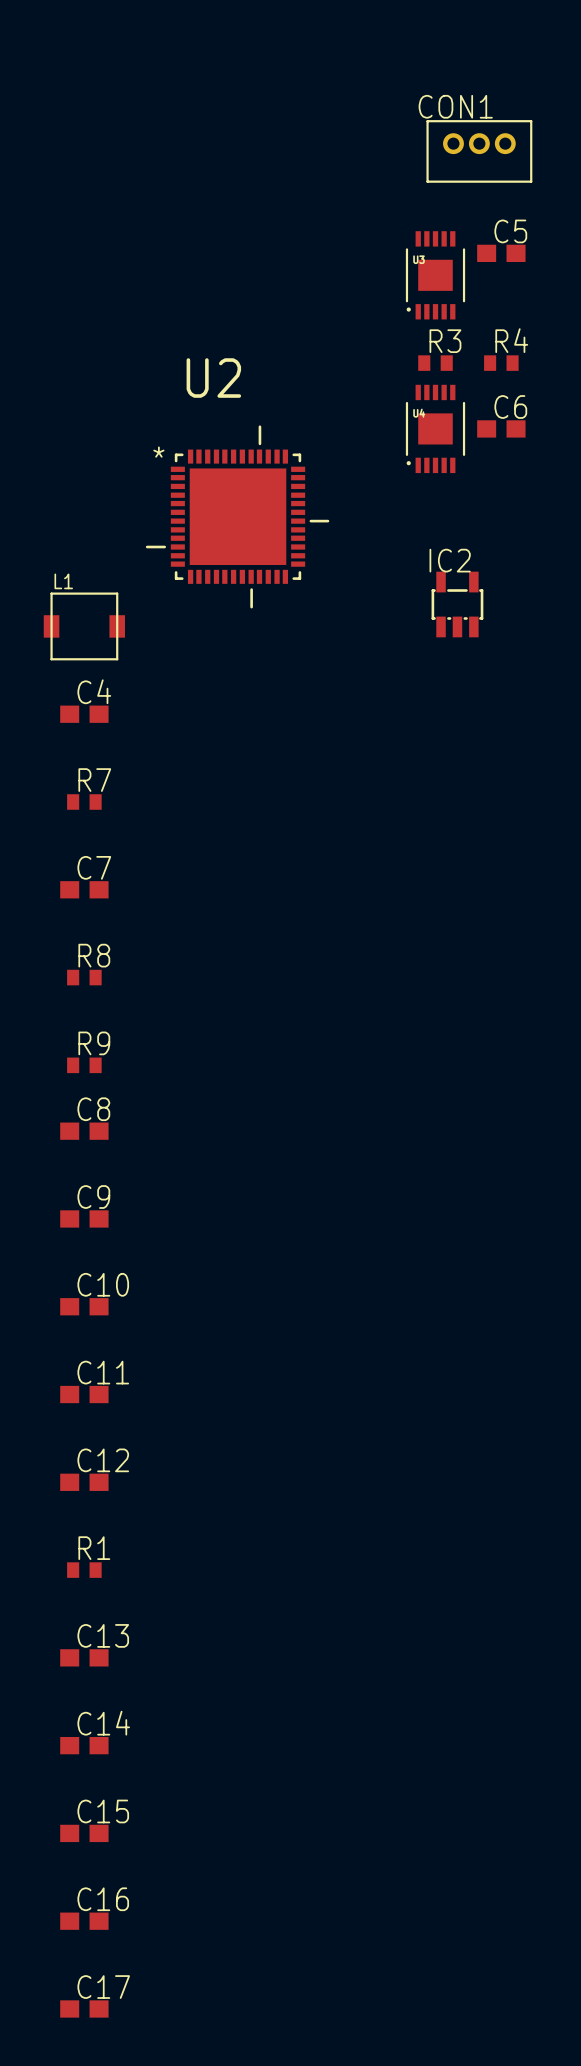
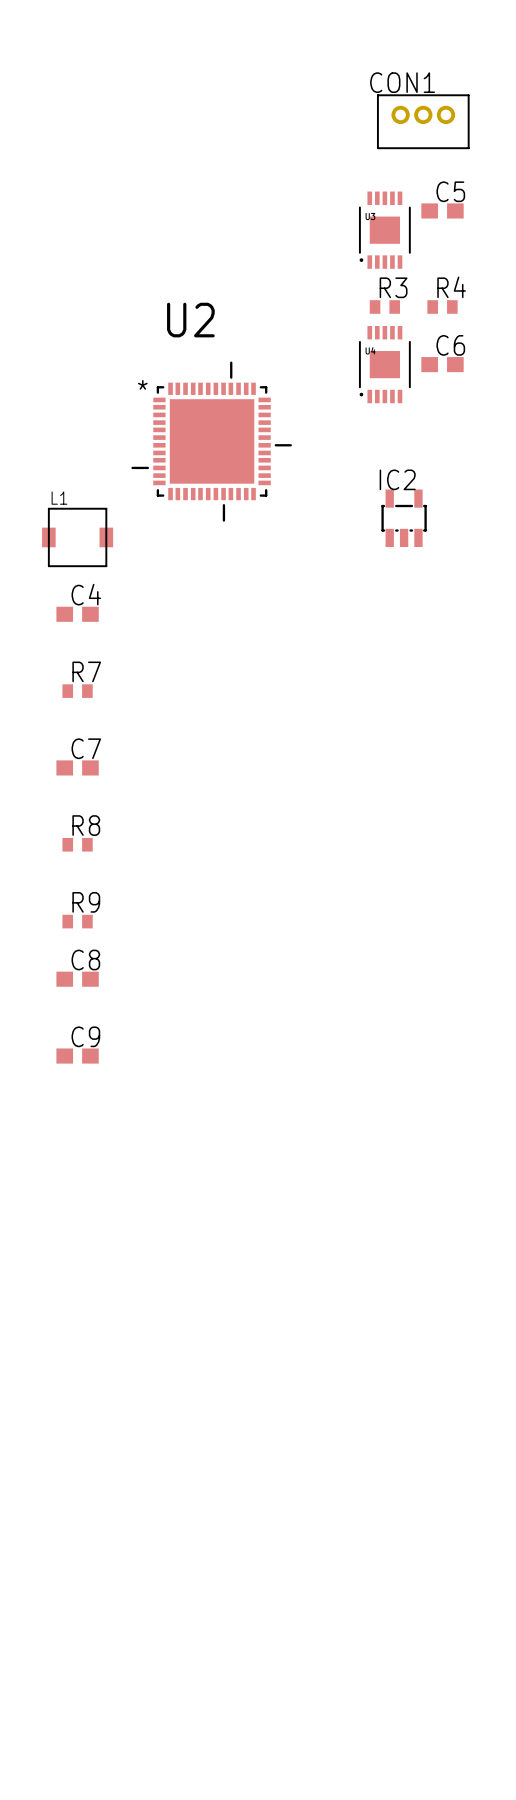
C10: (84, 1306) -> none
C11: (84, 1394) -> none
C12: (84, 1482) -> none
R1: (84, 1570) -> none
C13: (84, 1657) -> none
C14: (84, 1745) -> none
C15: (84, 1833) -> none
C16: (84, 1921) -> none
C17: (84, 2008) -> none

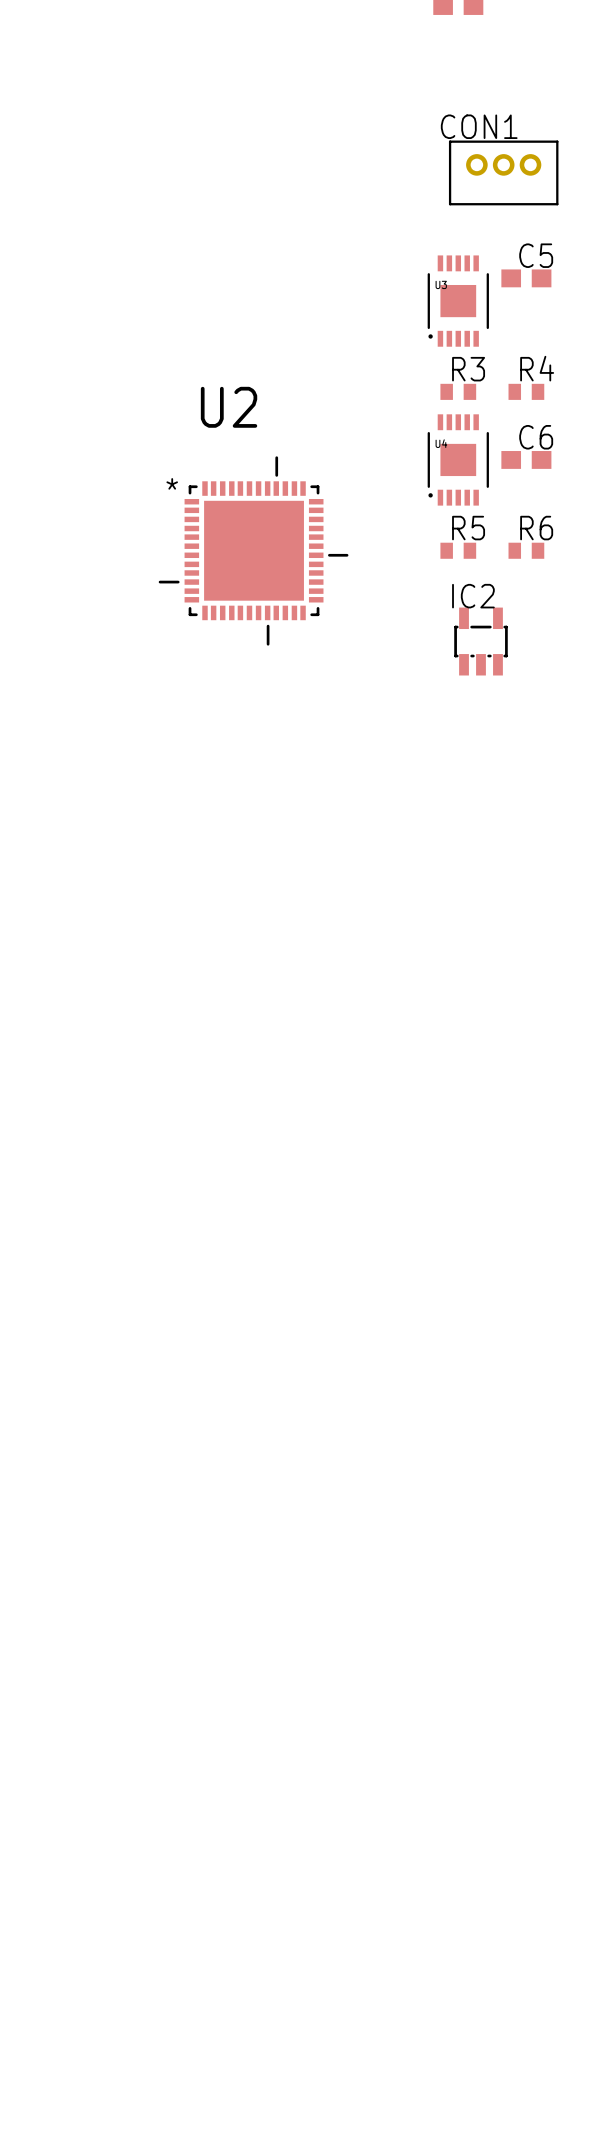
R5: none -> (458, 550)
R6: none -> (526, 550)
L1: (77, 537) -> none
C4: (77, 614) -> none
R7: (77, 691) -> none
C7: (77, 767) -> none
R8: (77, 844) -> none
R9: (77, 921) -> none
C8: (77, 979) -> none
C9: (77, 1056) -> none

